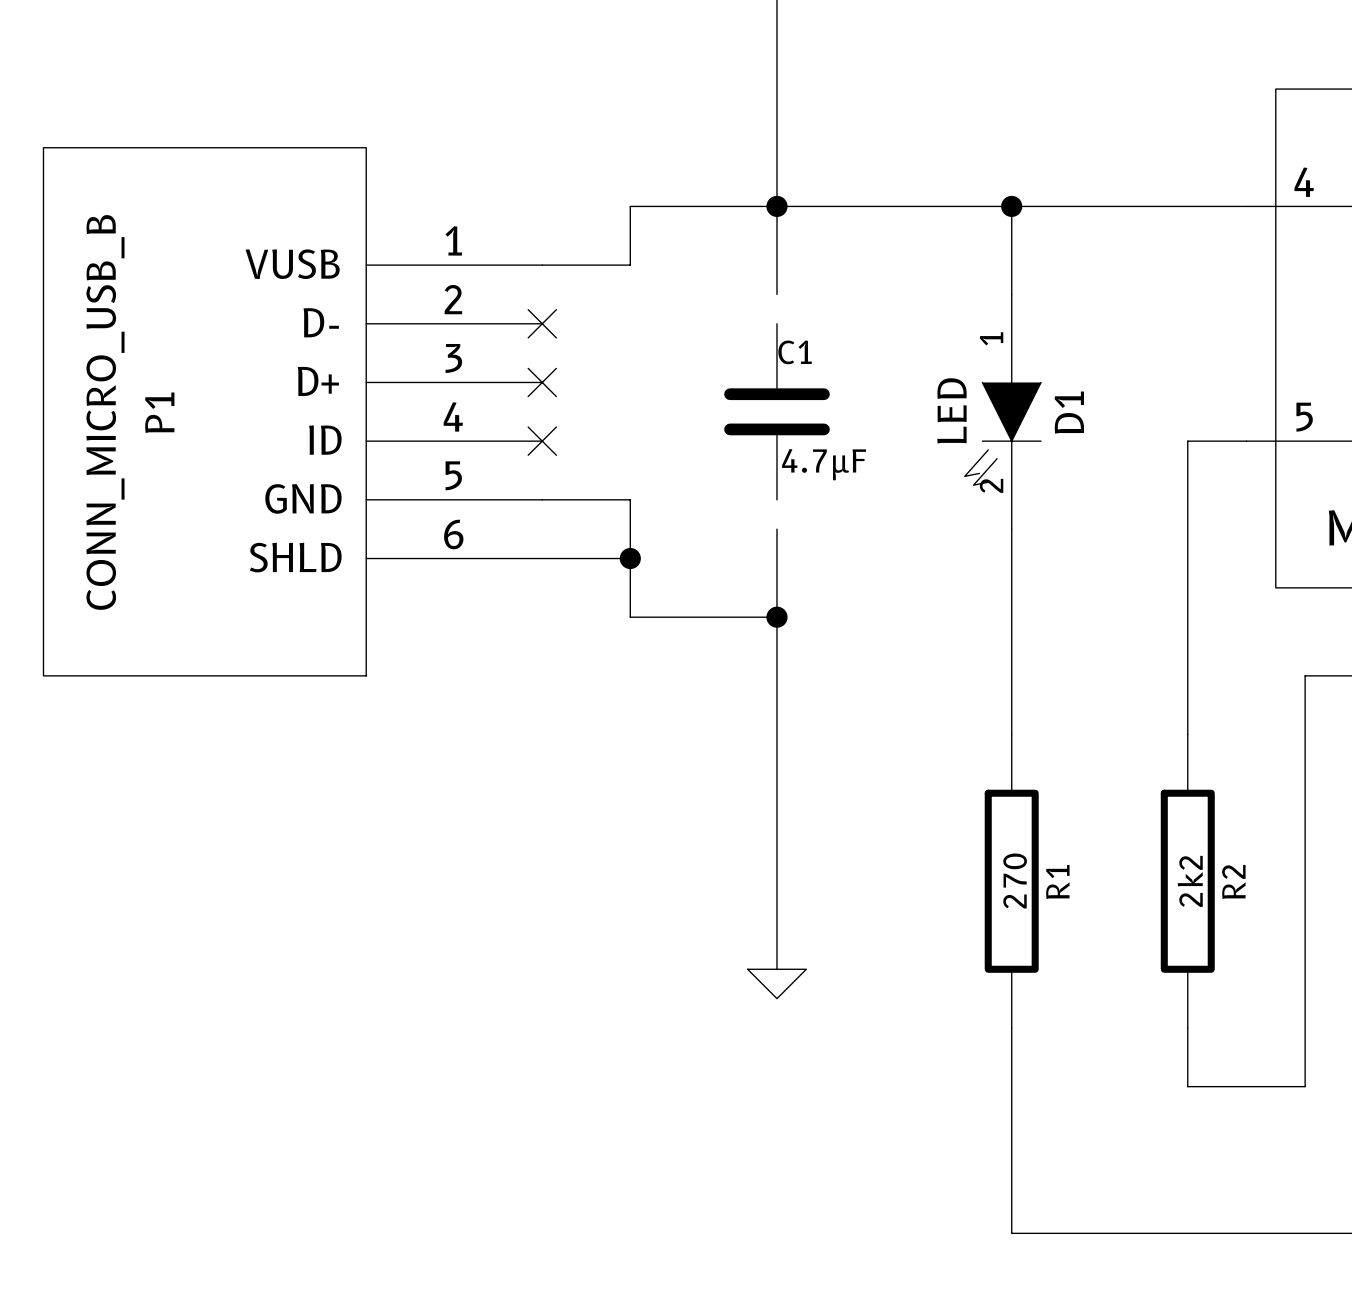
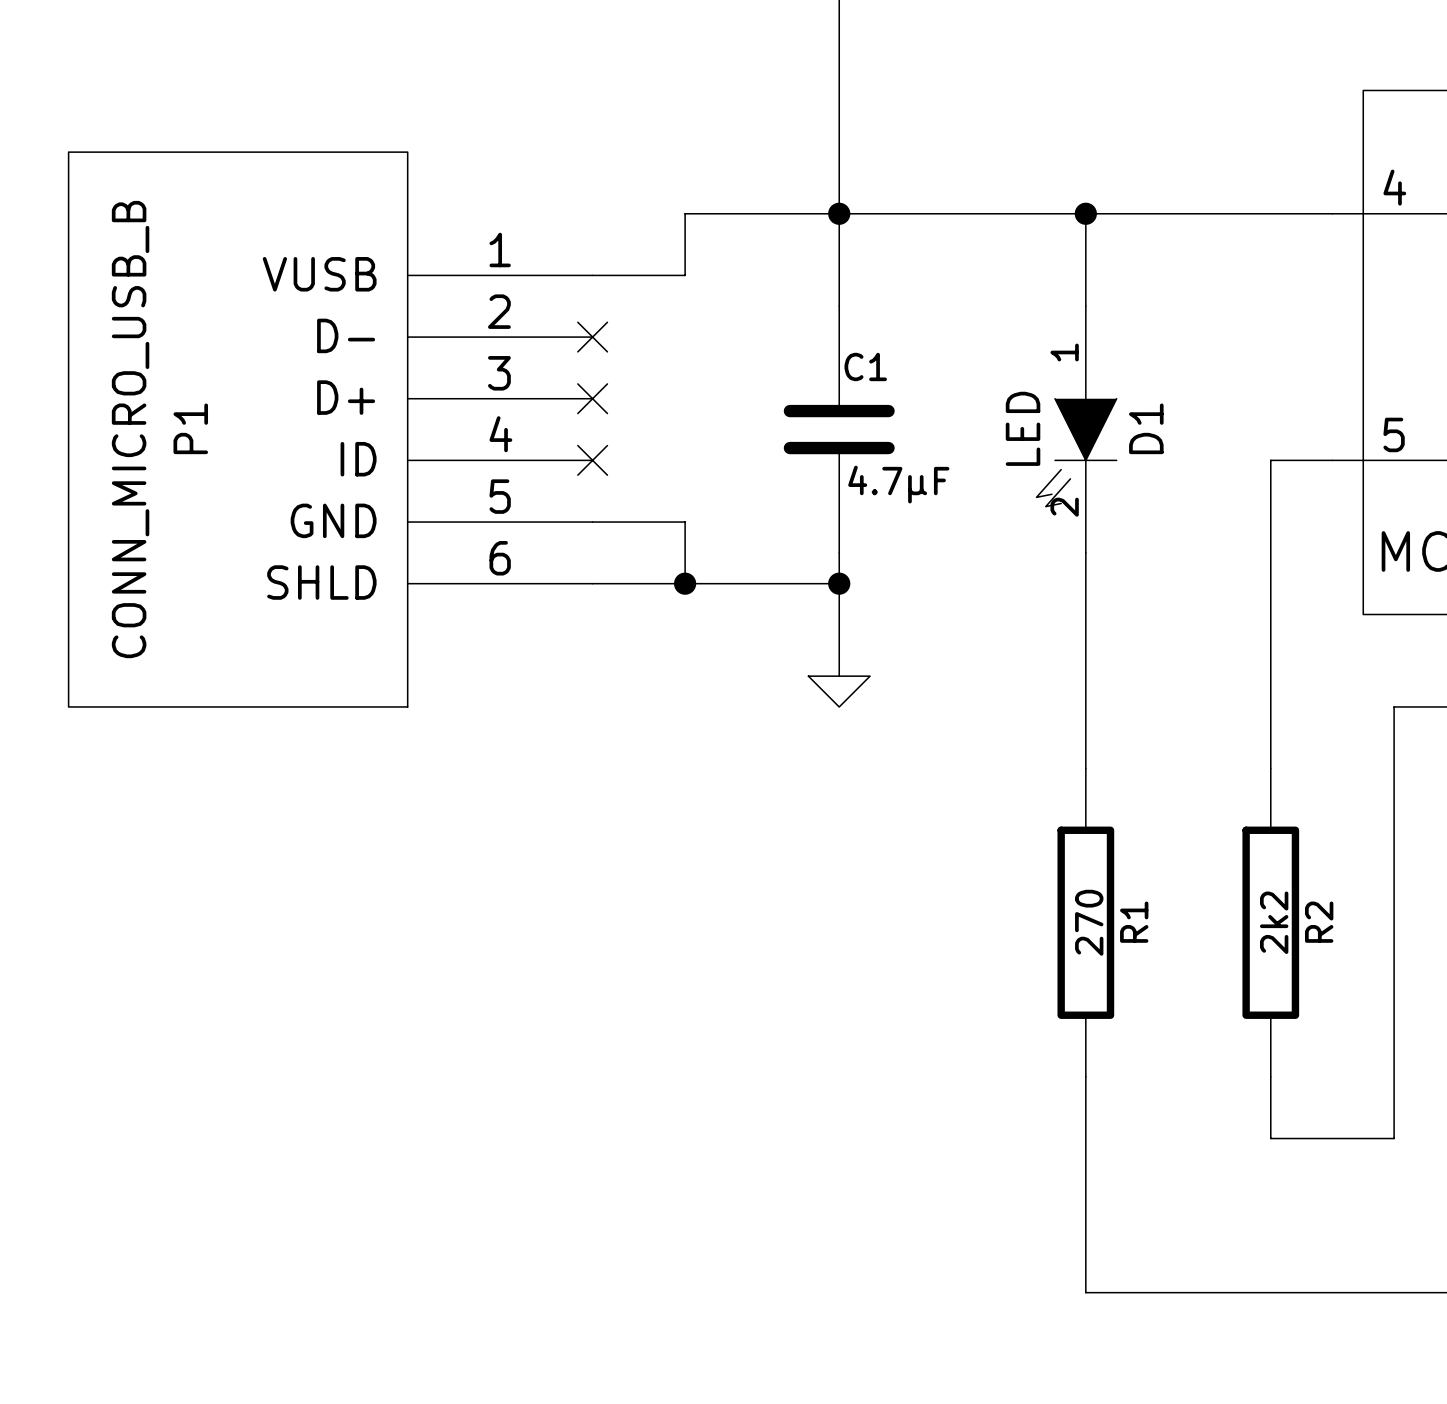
C1 symbol: [724, 323, 830, 500] -> [783, 306, 895, 553]
wire: (630, 558) (630, 617) (777, 617) -> (685, 583) (839, 583)
junction position: (777, 617) -> (839, 583)
wire: (777, 646) (777, 969) -> none
power symbol position: (777, 983) -> (839, 691)

